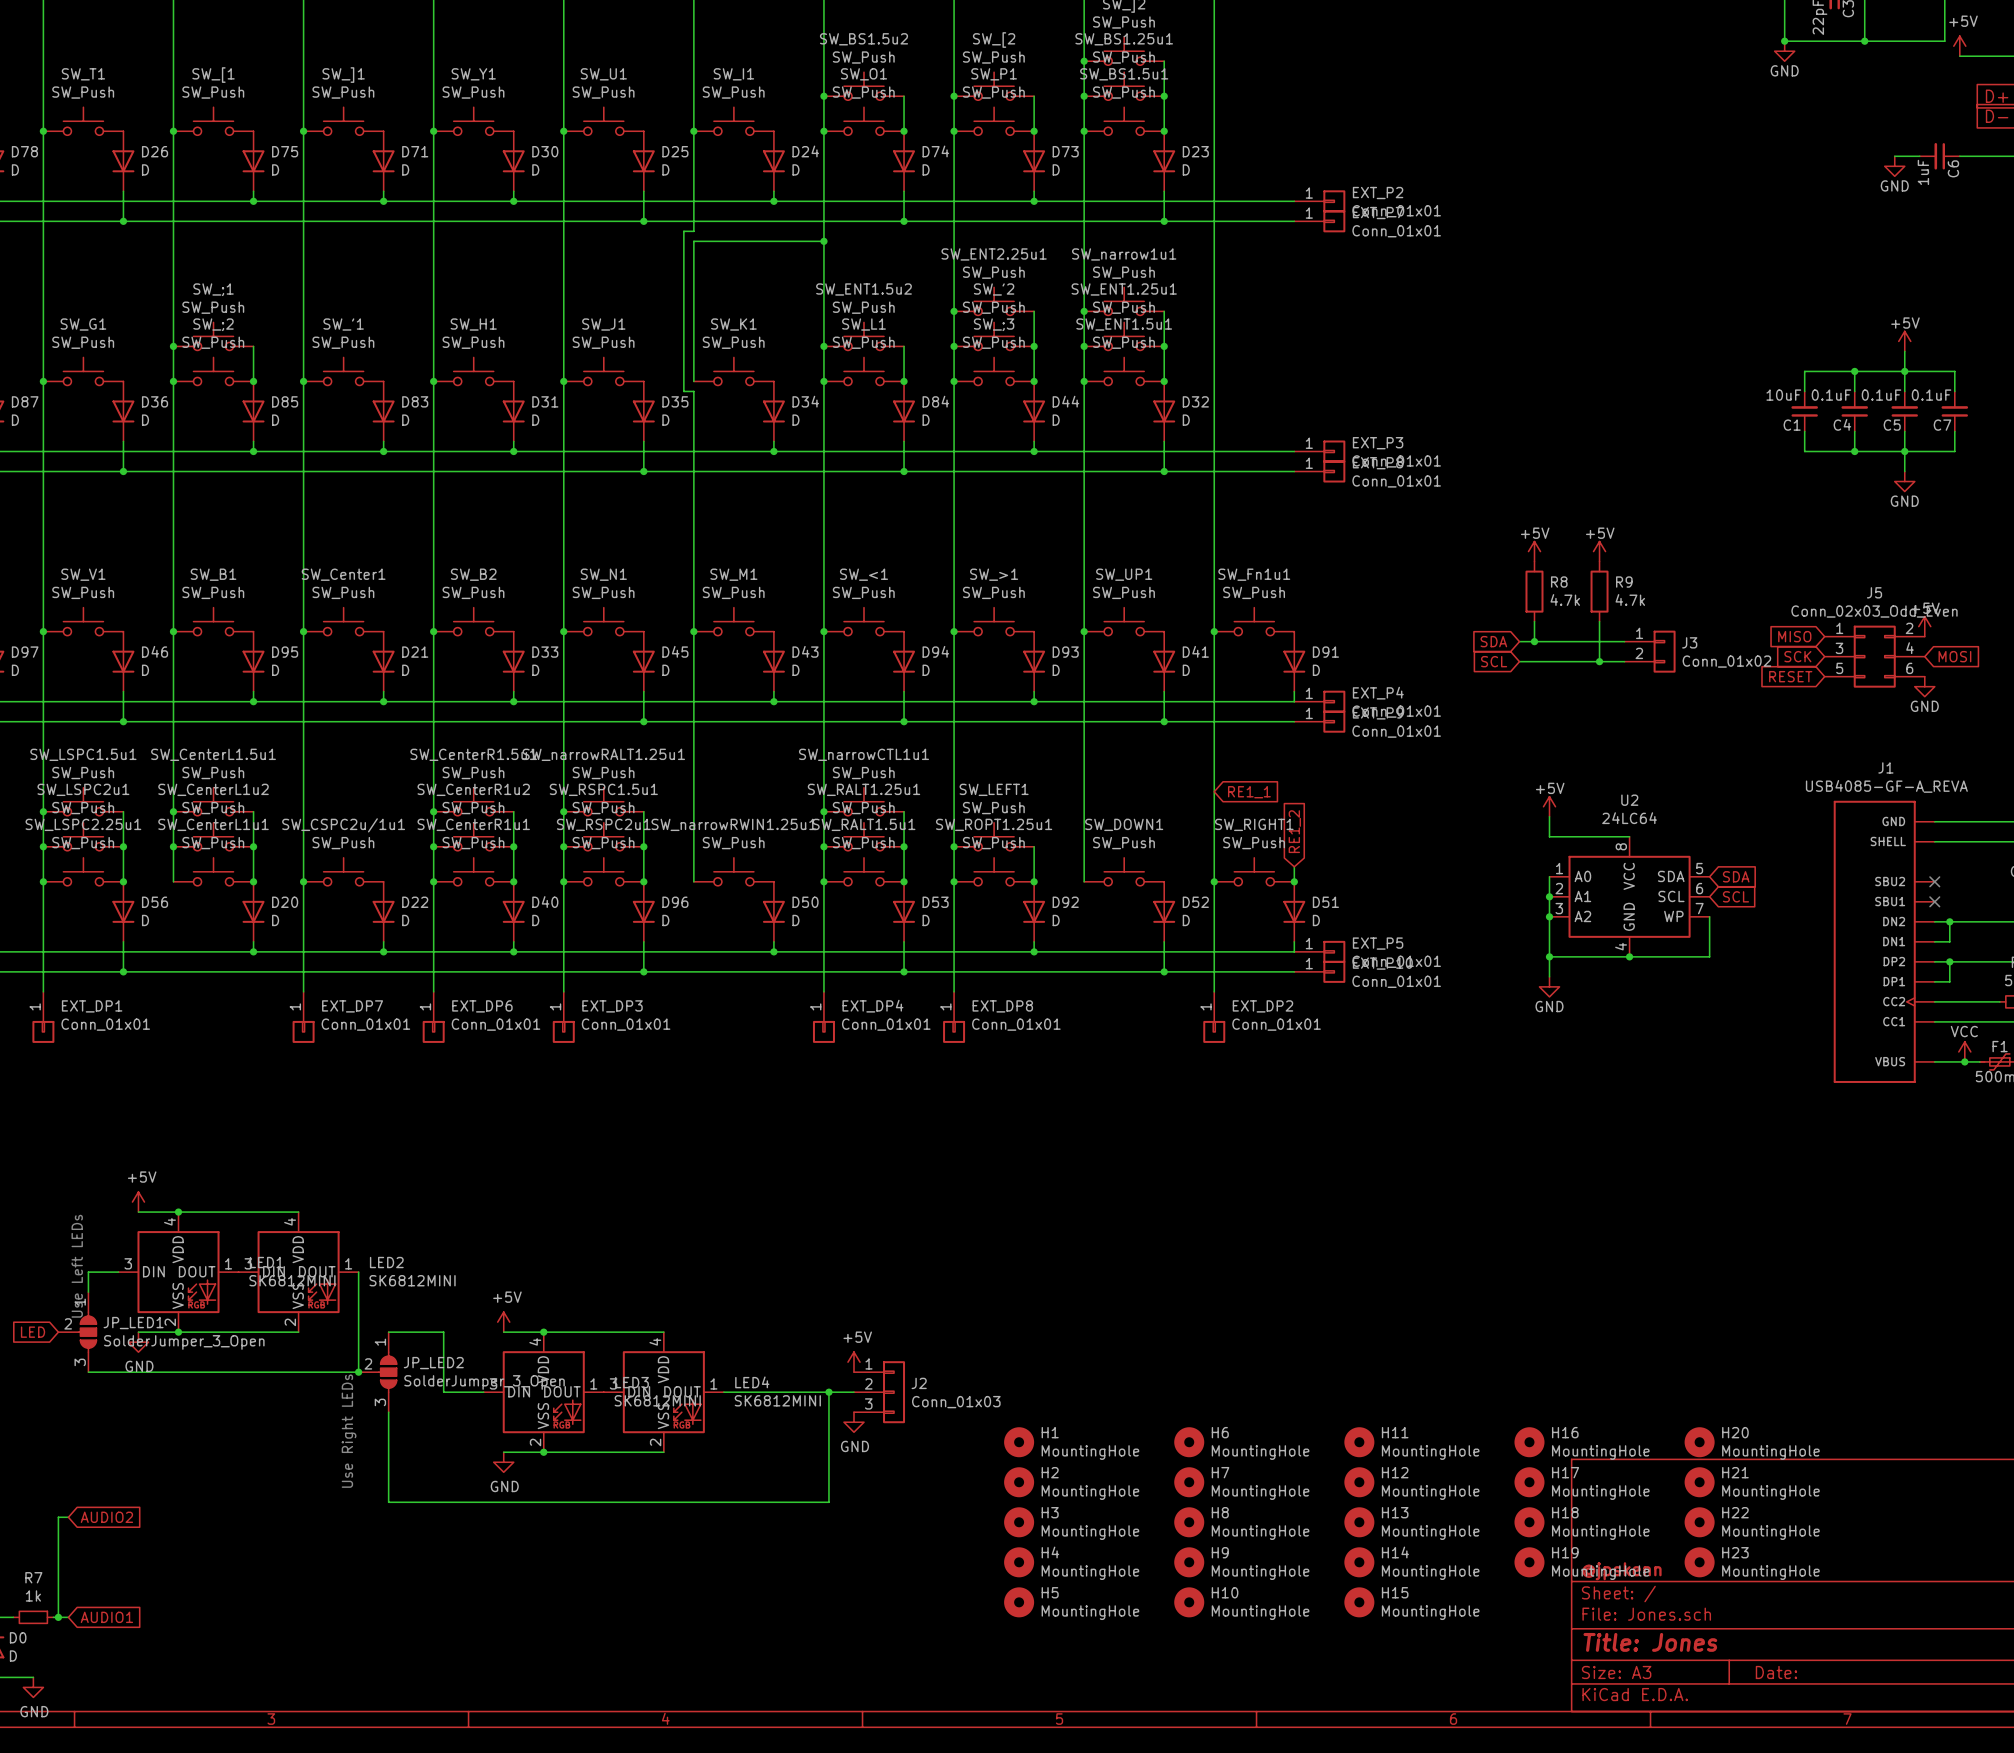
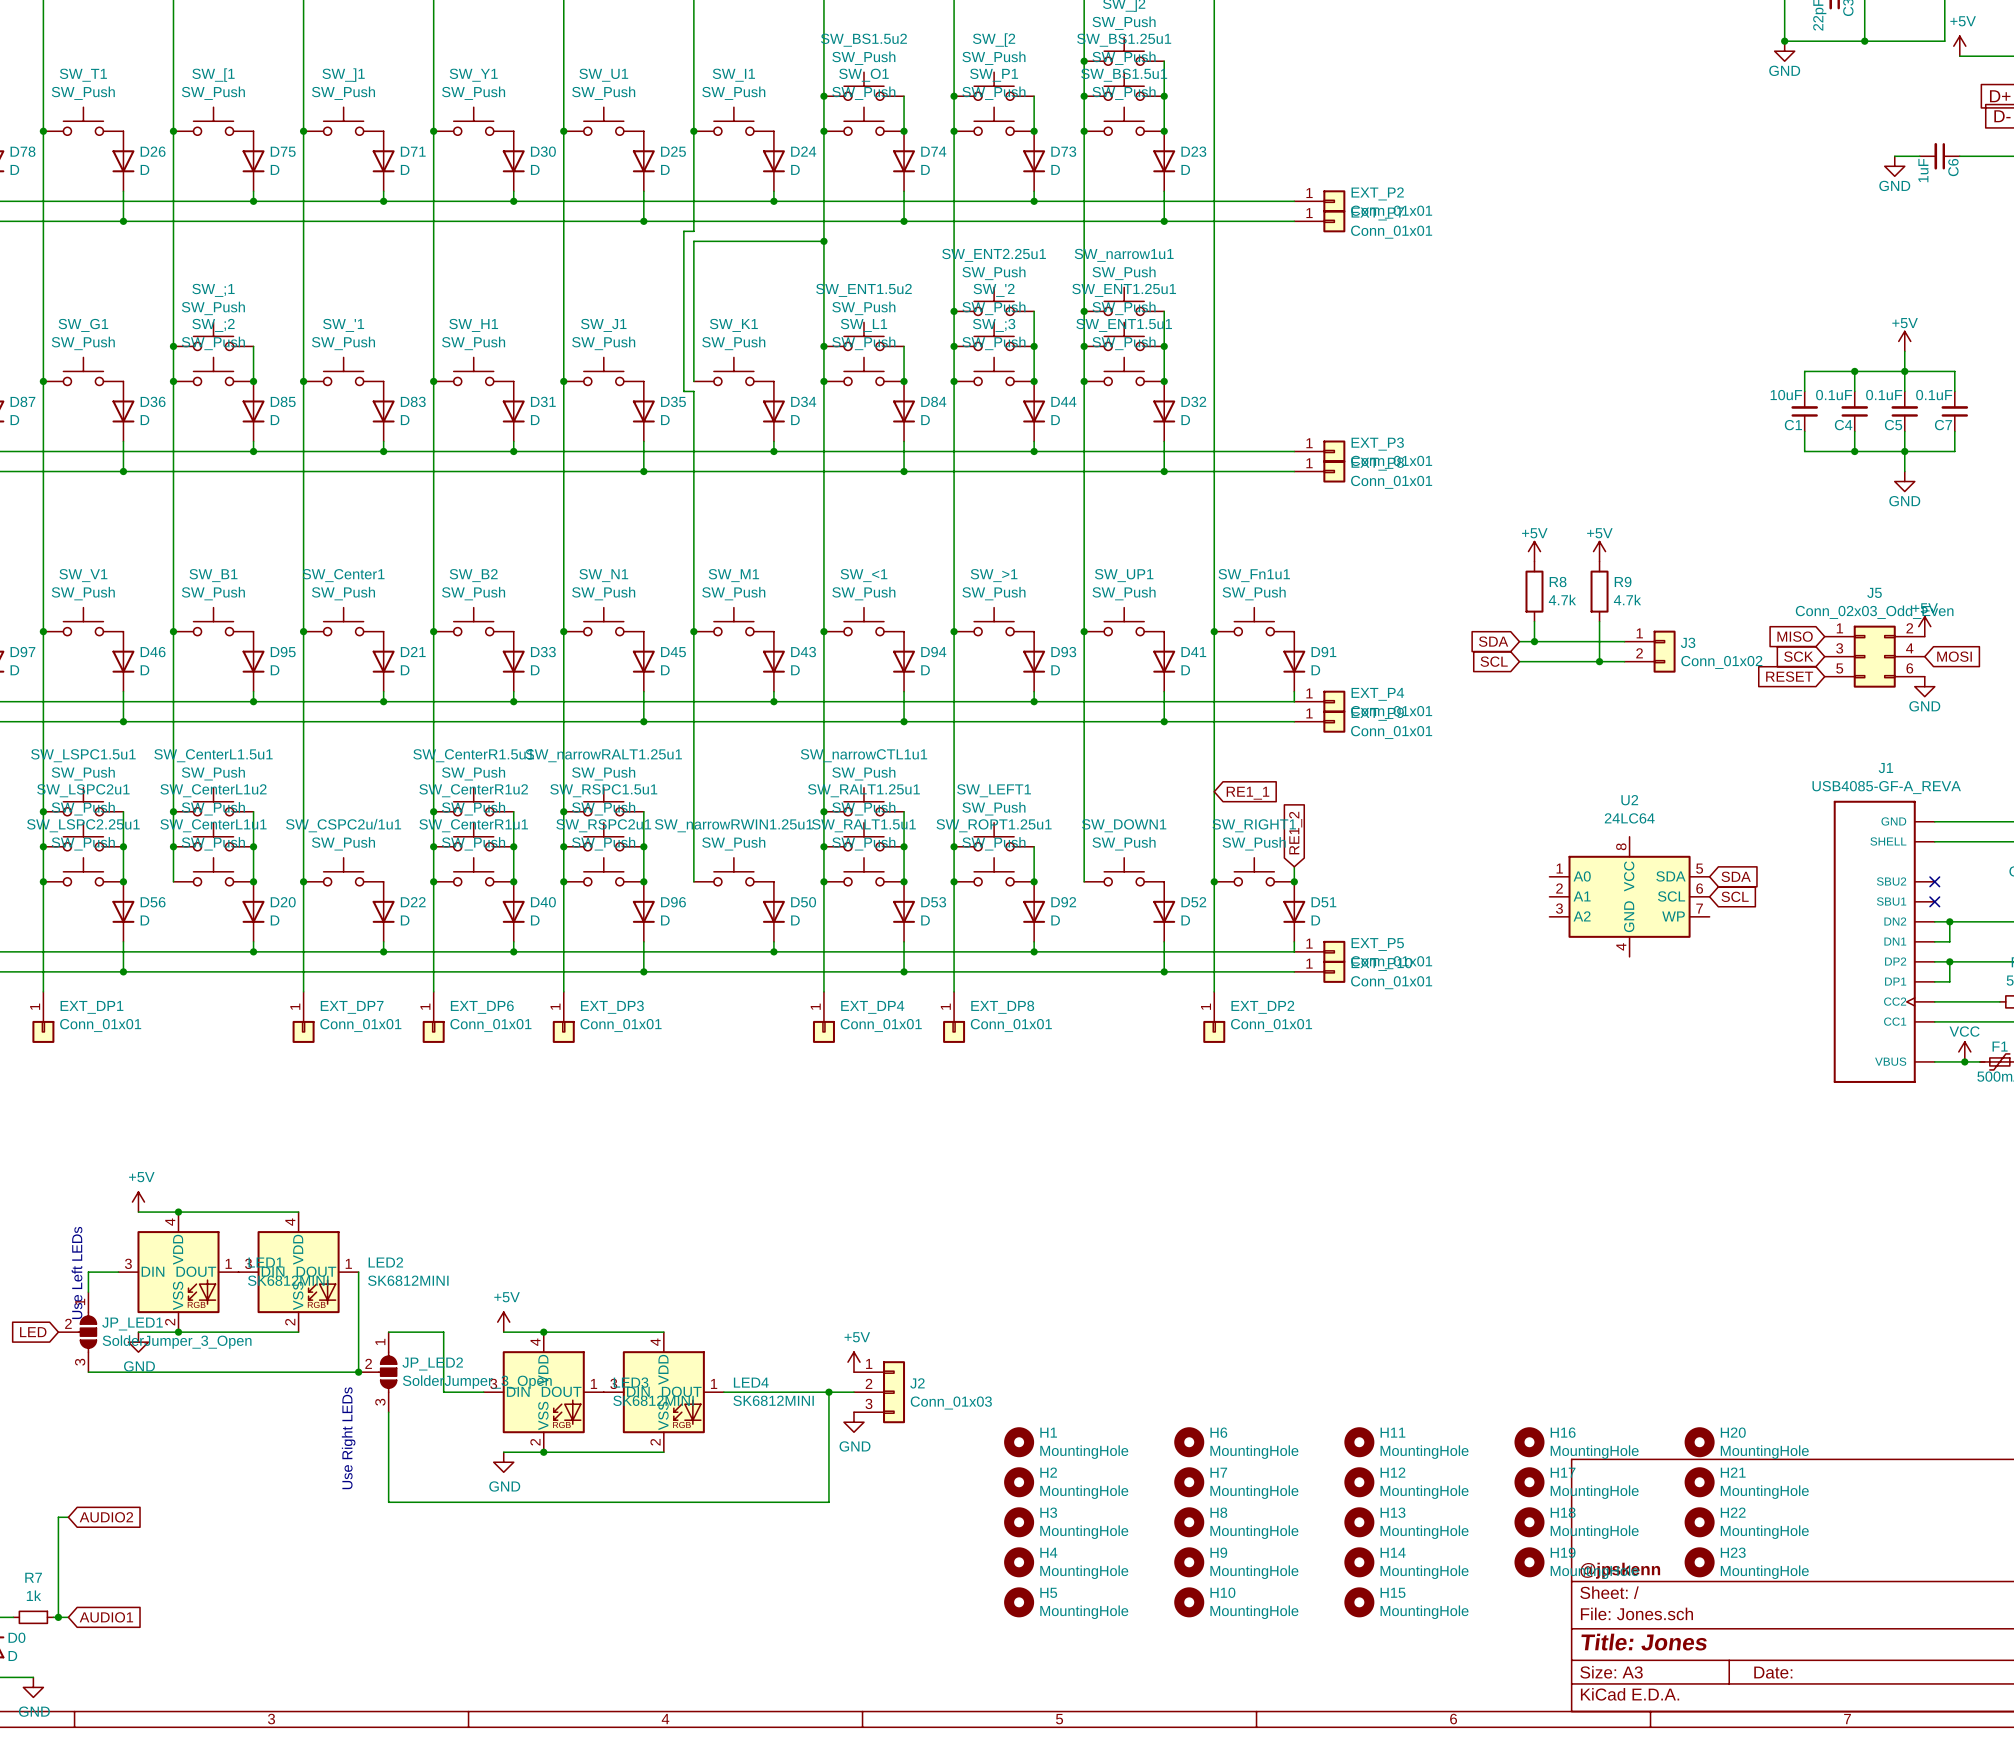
power symbol: +5V (1549, 806) -> none
wire: (1549, 816) (1549, 836) (1629, 836) -> none
wire: (1549, 876) (1549, 976) -> none
junction: (1549, 896) -> none
junction: (1549, 916) -> none
wire: (1709, 916) (1709, 956) (1549, 956) -> none
junction: (1549, 956) -> none
junction: (1629, 956) -> none
power symbol: GND (1549, 986) -> none

